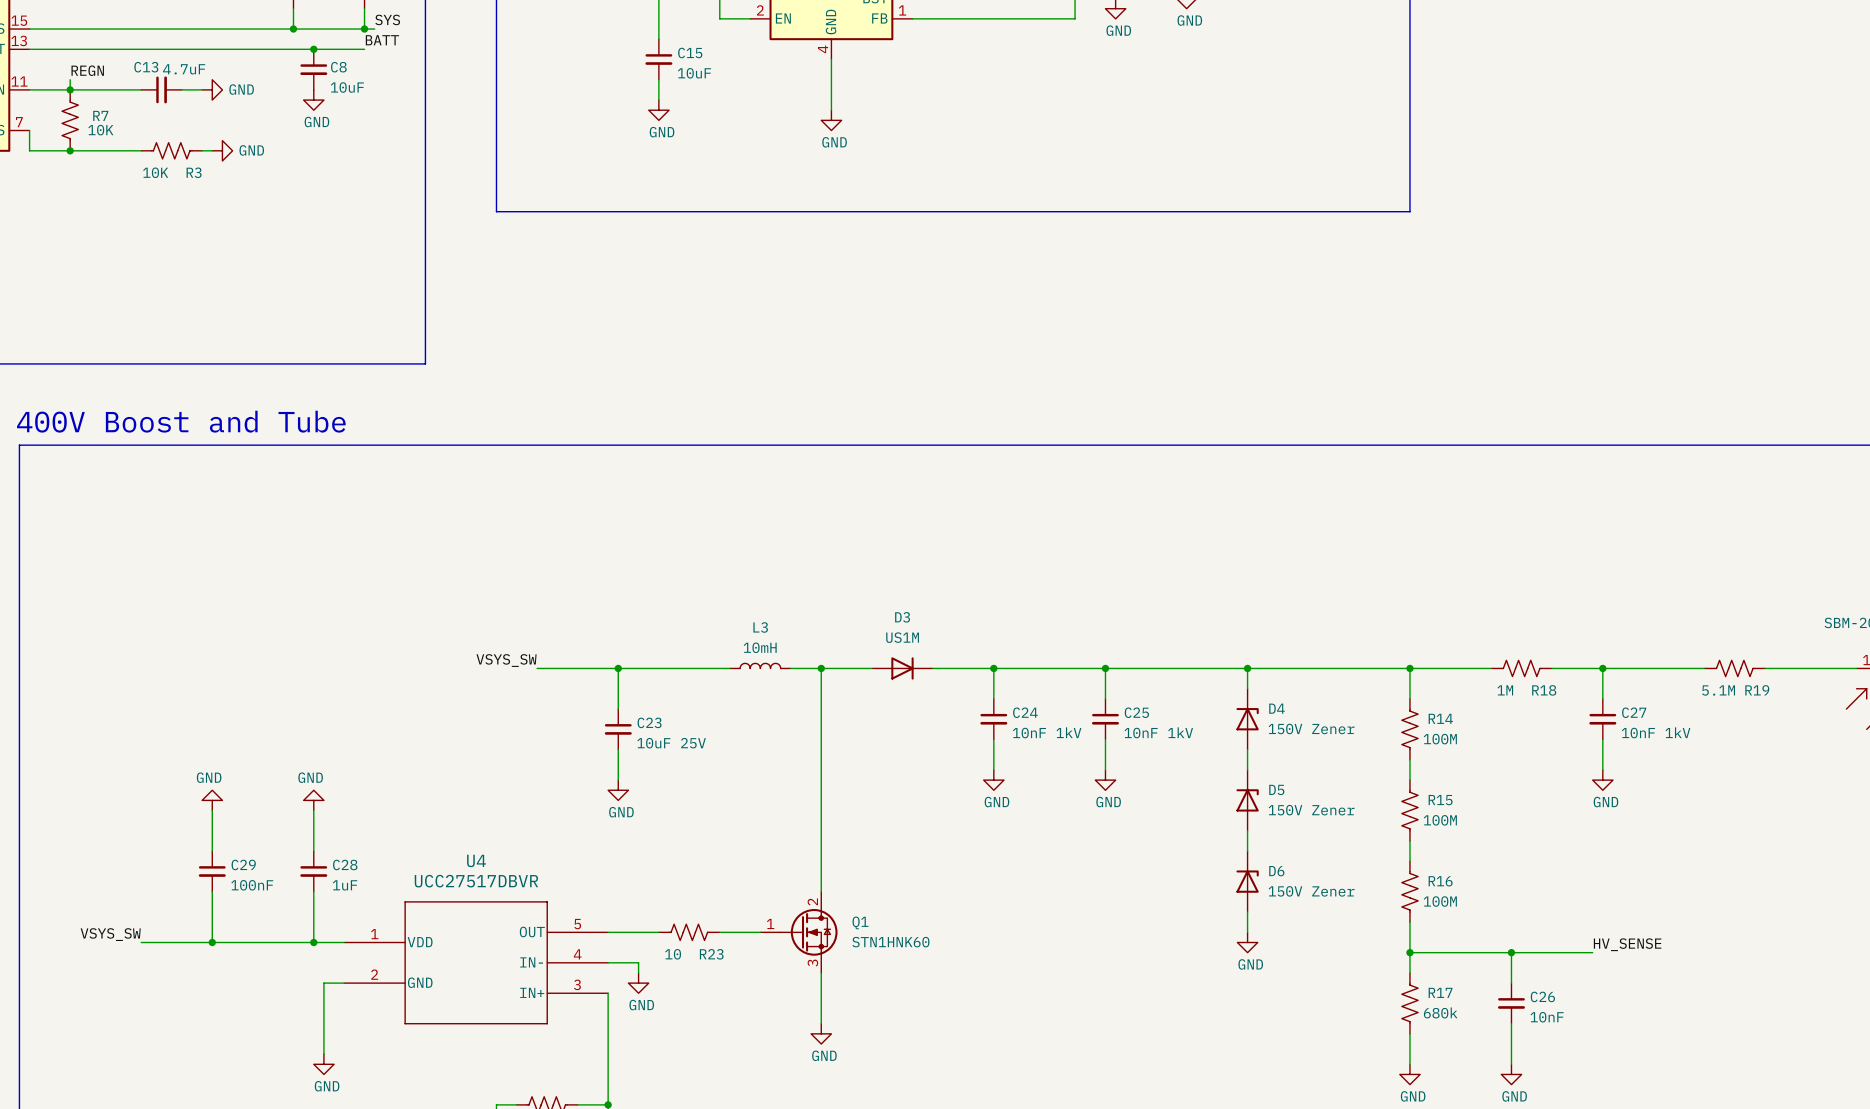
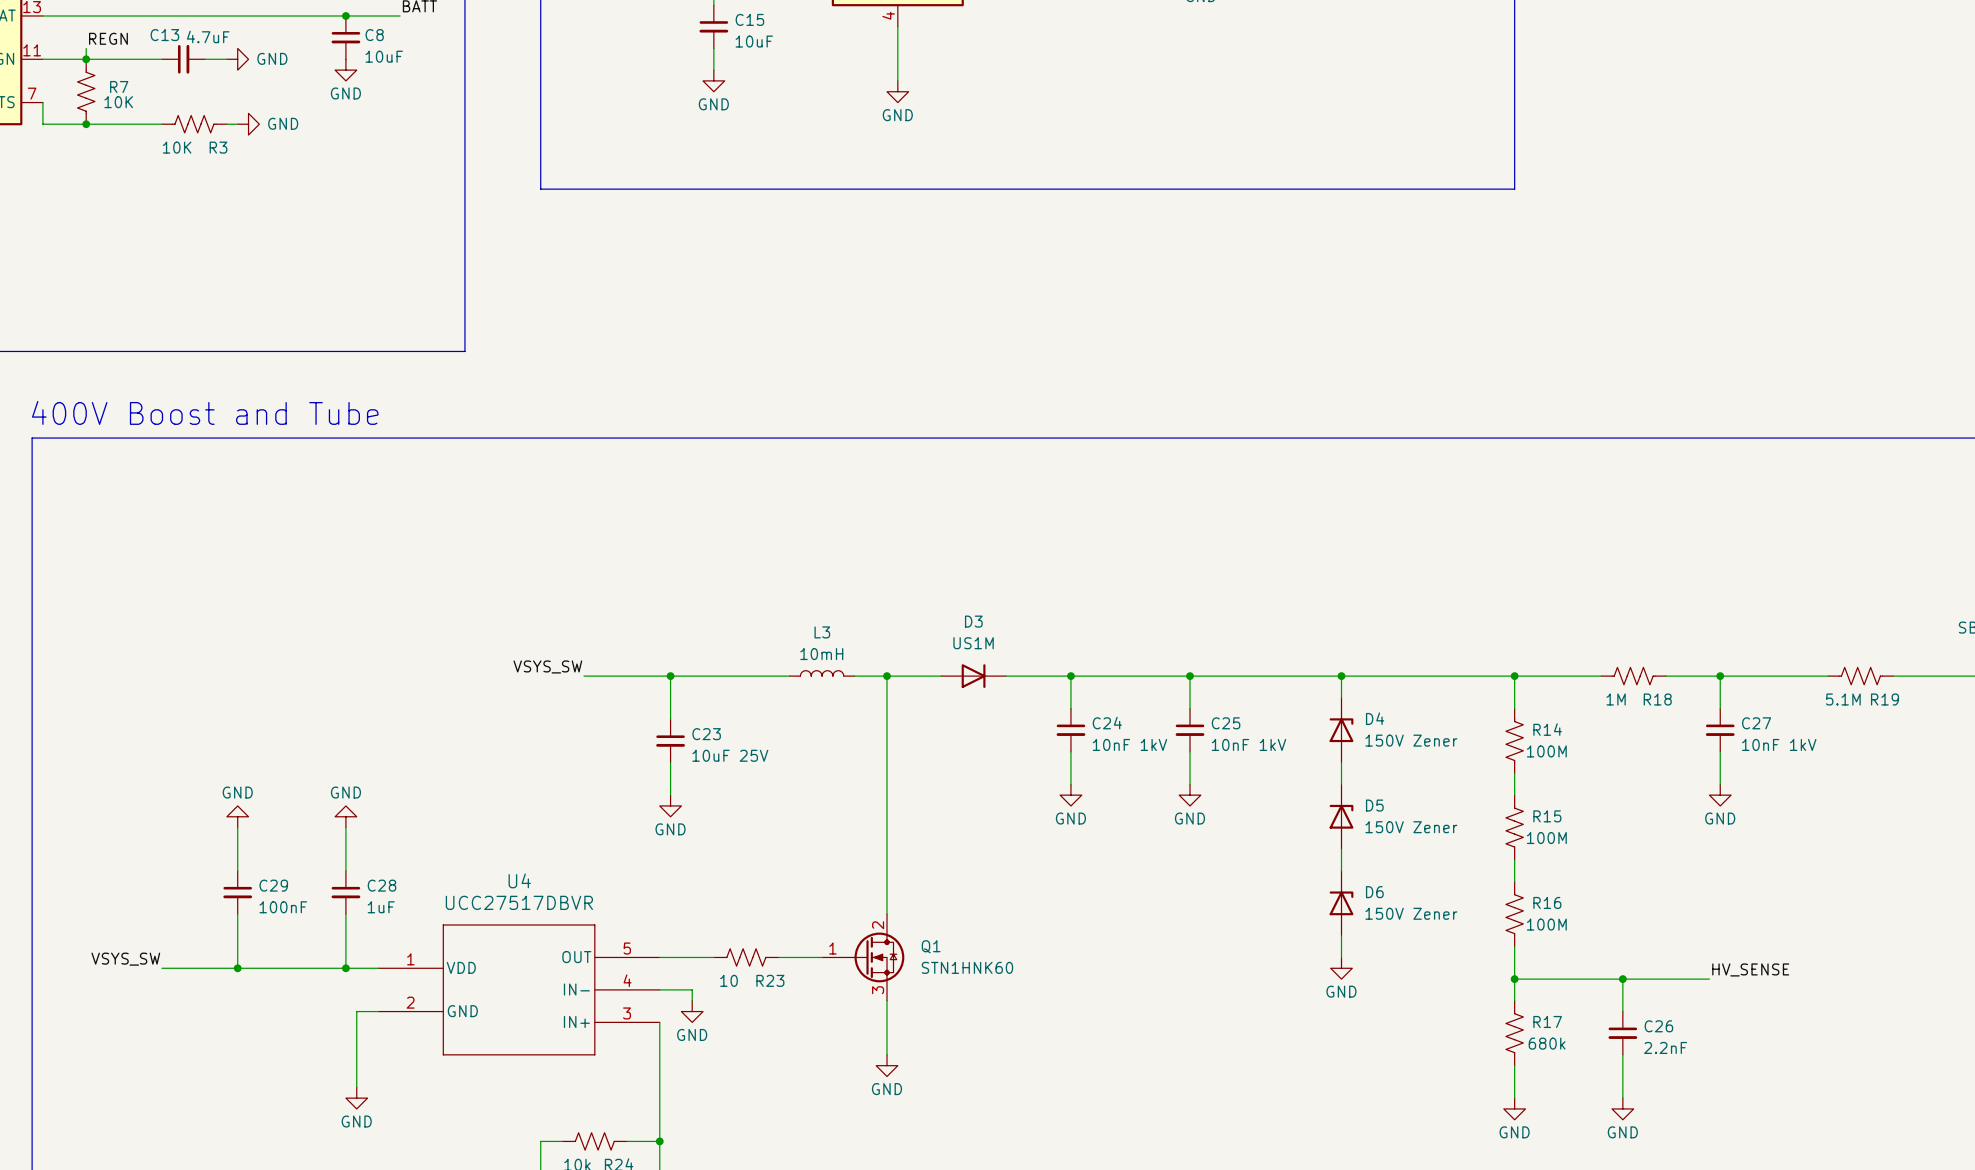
C26 value: 10nF (1547, 1017) -> 2.2nF (1665, 1047)

